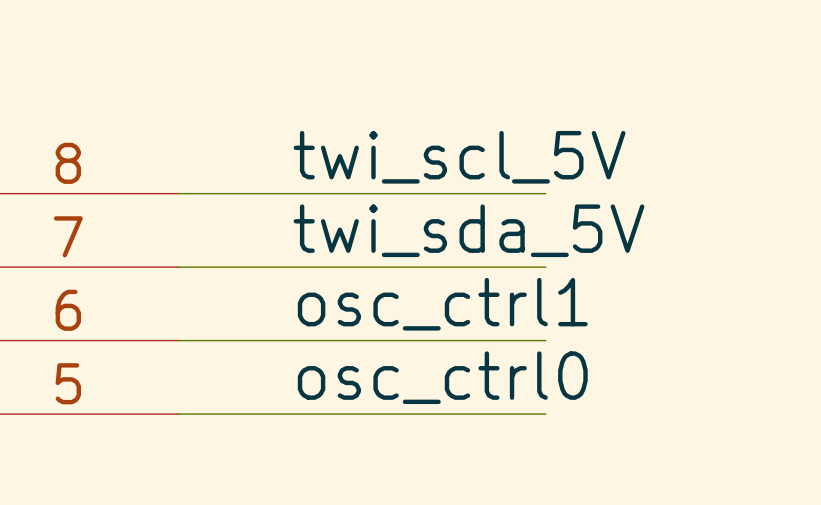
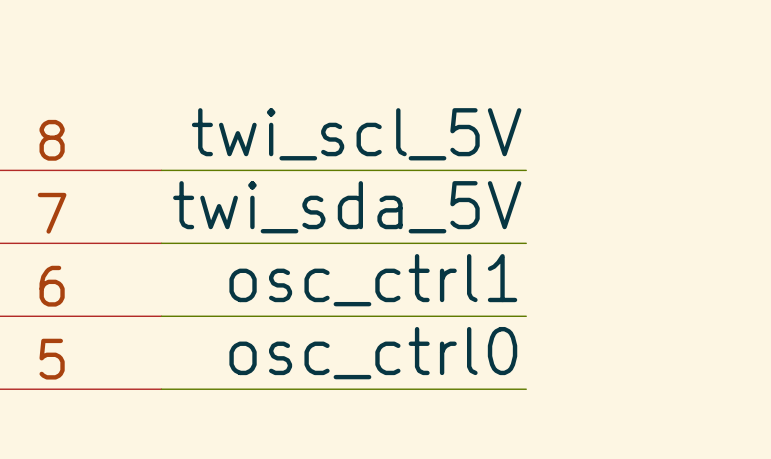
label position: twi_scl_5V (459, 157) -> twi_scl_5V (356, 134)
label position: twi_sda_5V (469, 230) -> twi_sda_5V (347, 207)
label position: osc_ctrl1 (442, 304) -> osc_ctrl1 (373, 280)
label position: osc_ctrl0 (442, 377) -> osc_ctrl0 (373, 353)

